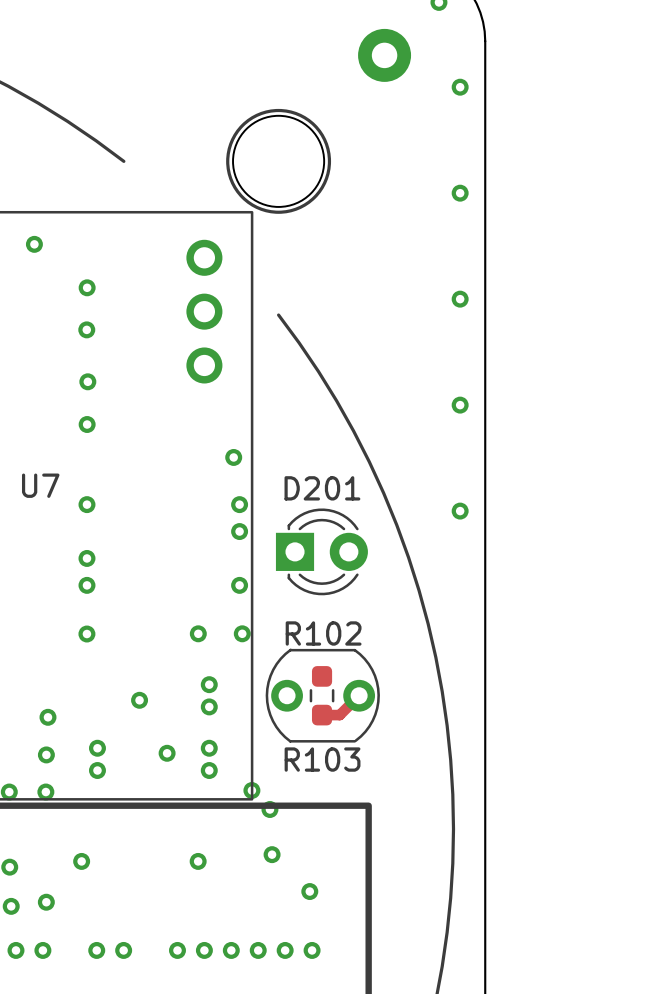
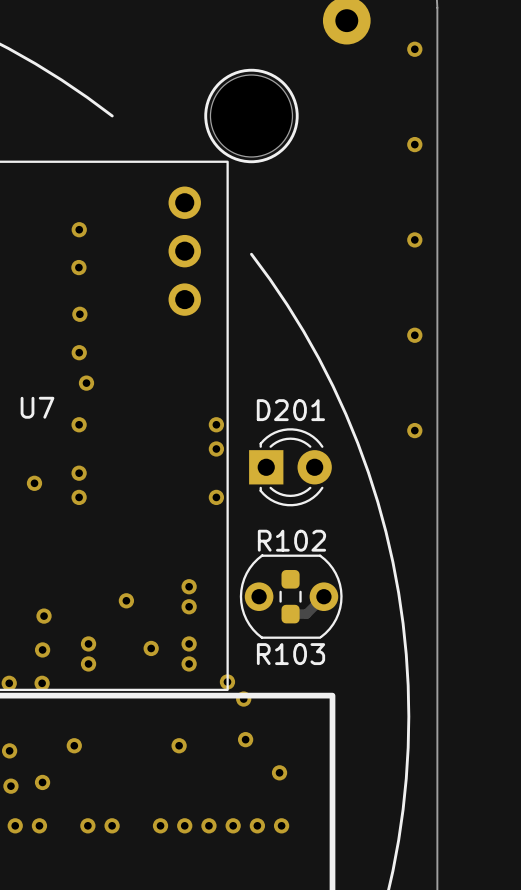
via: (34, 244) -> none
via: (233, 457) -> none
via: none -> (86, 383)
via: (198, 633) -> none
via: (242, 633) -> none
via position: (86, 634) -> (34, 483)

